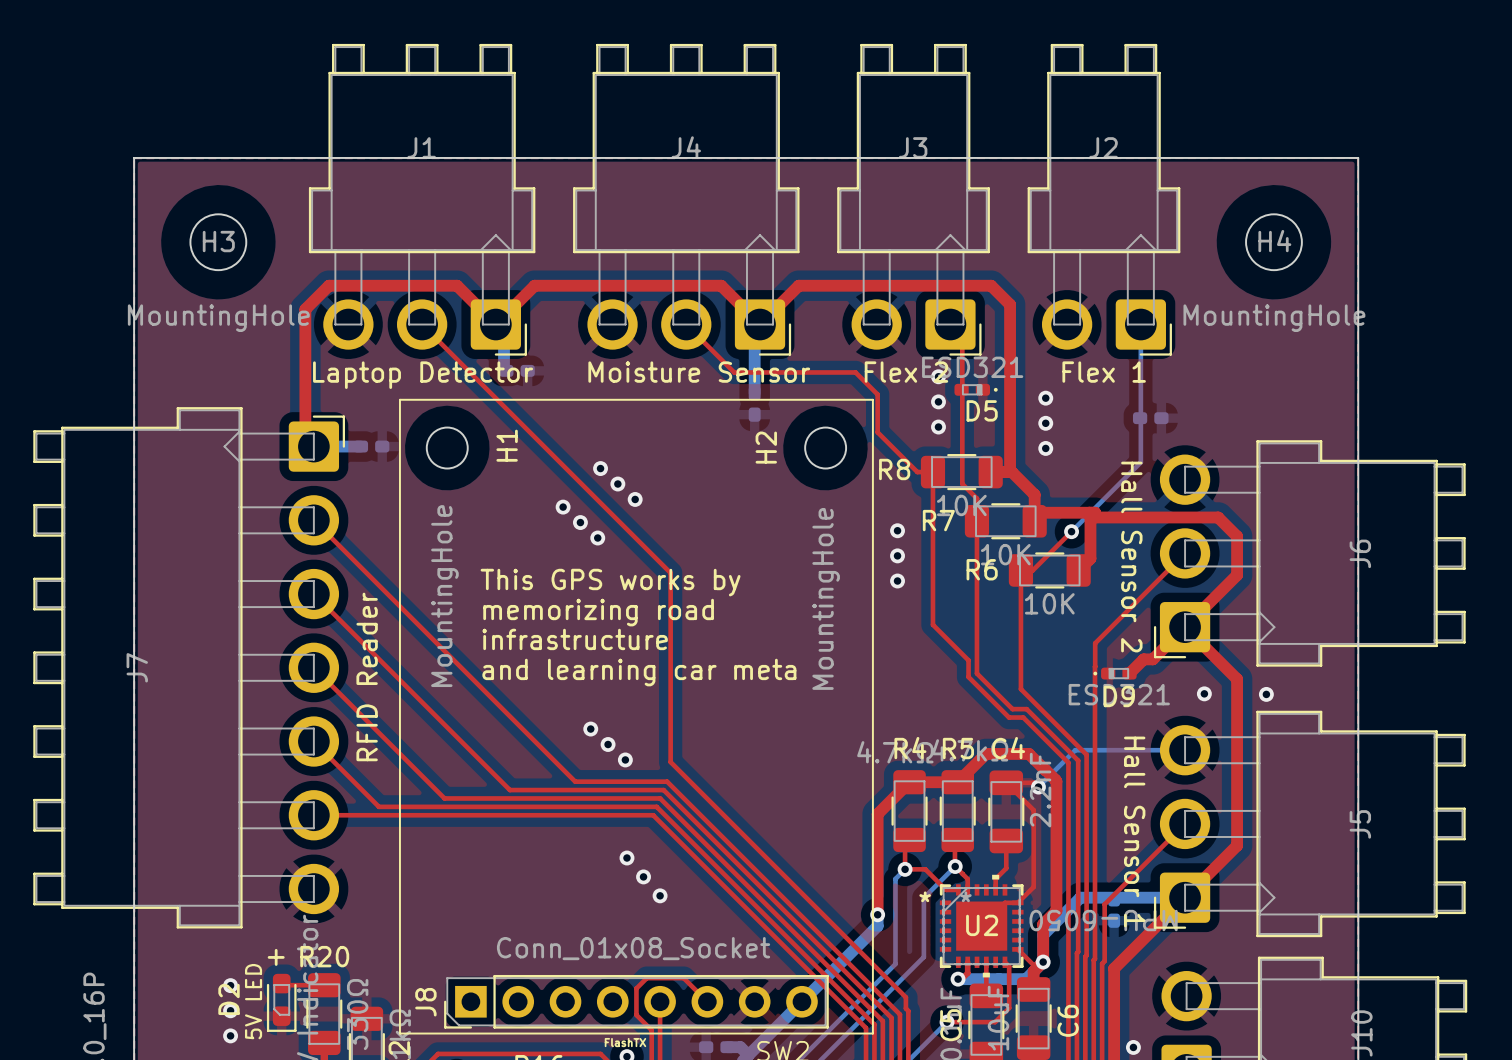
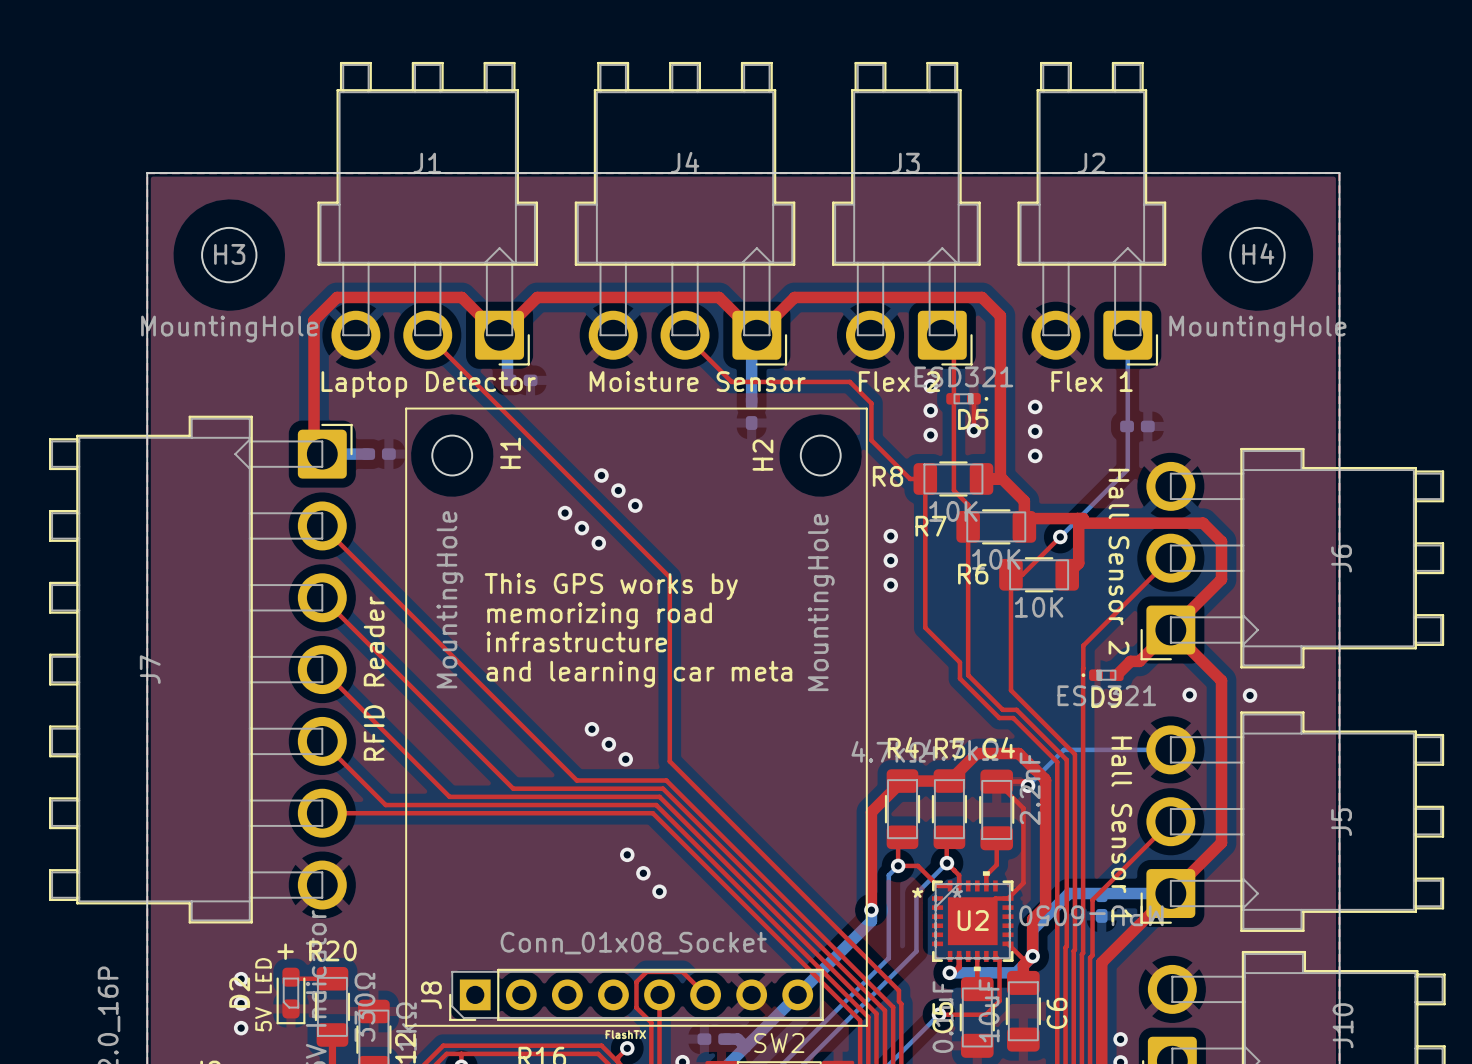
top track: none -> (973, 398) (973, 430)
via: none -> (973, 430)

